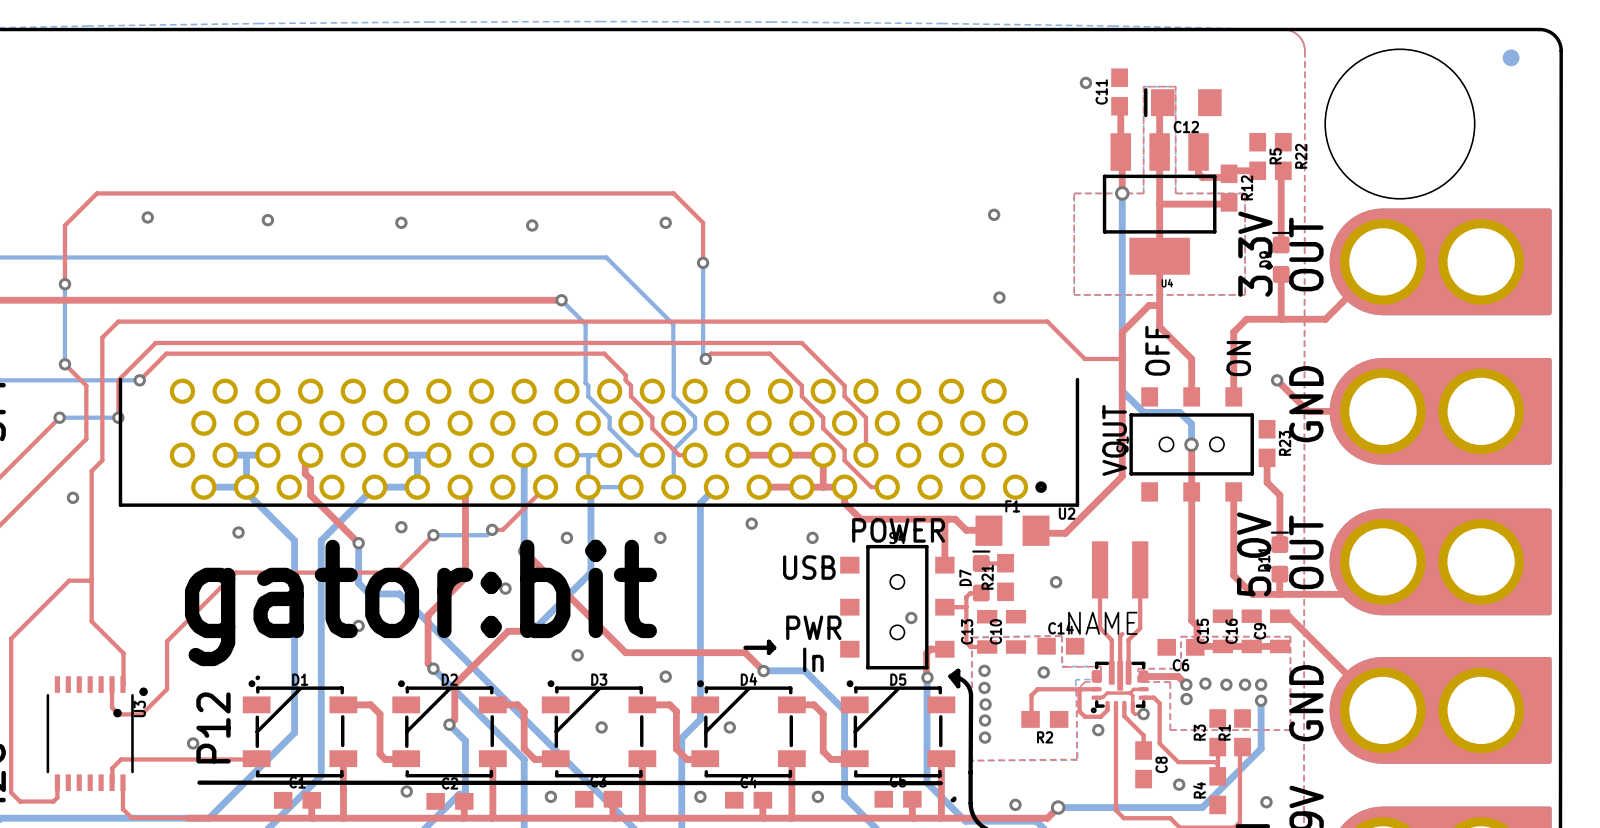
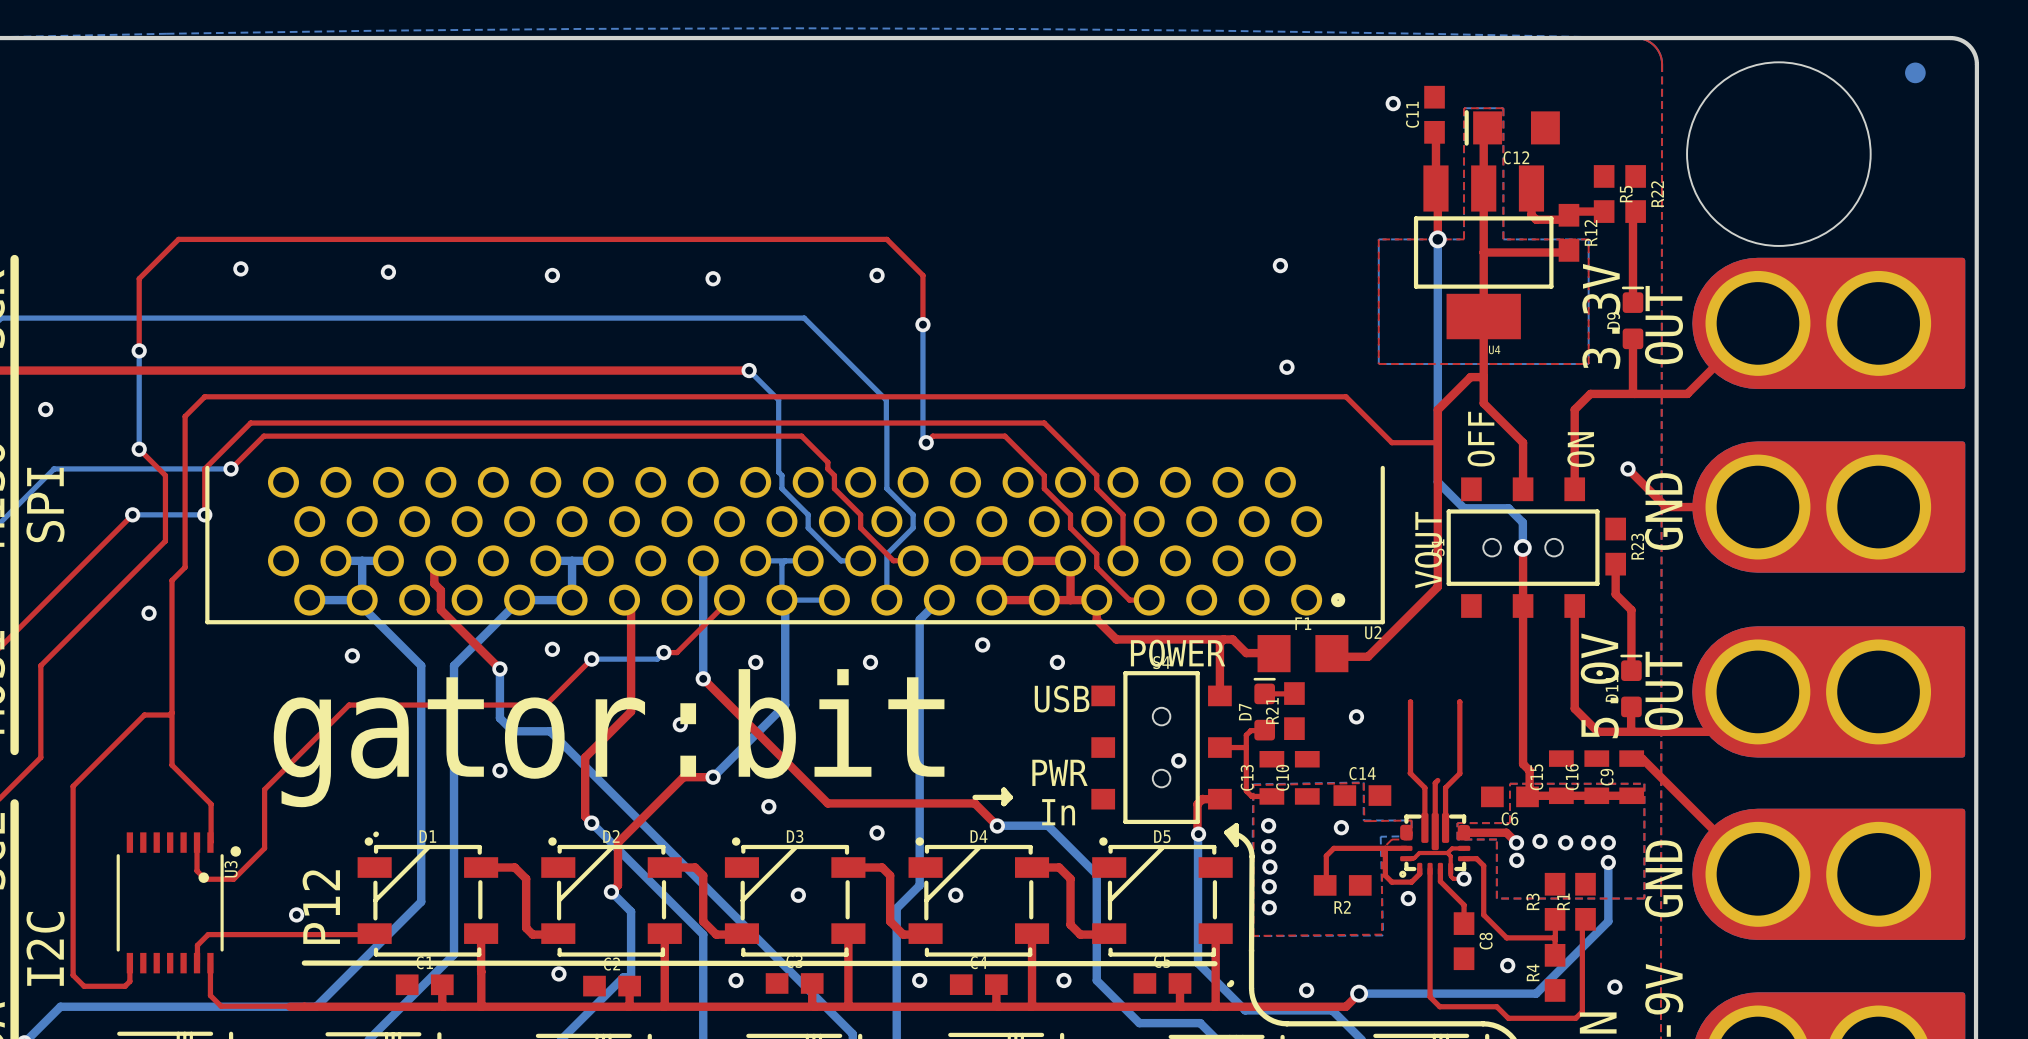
part: (1120, 569) -> none

